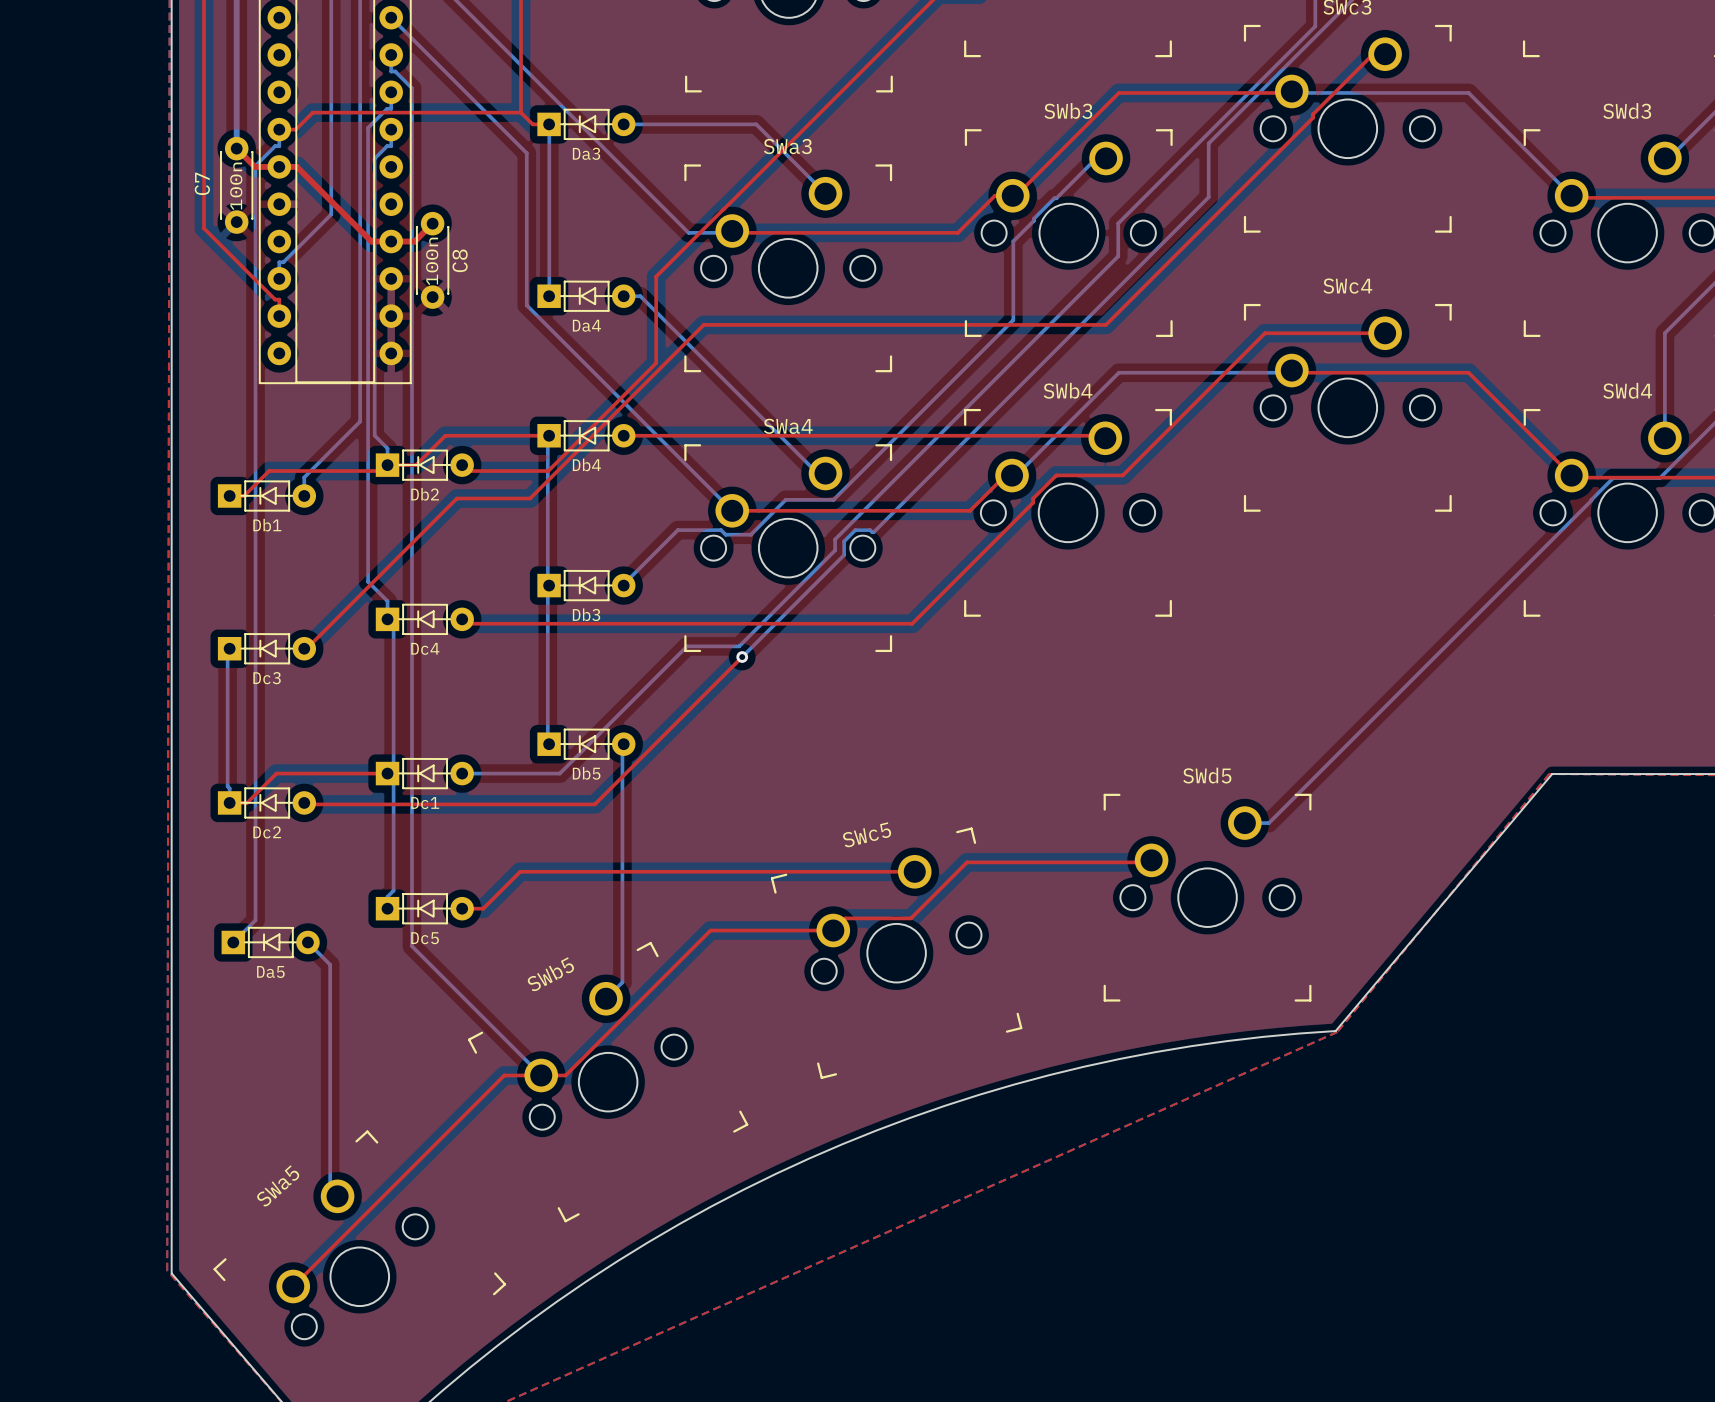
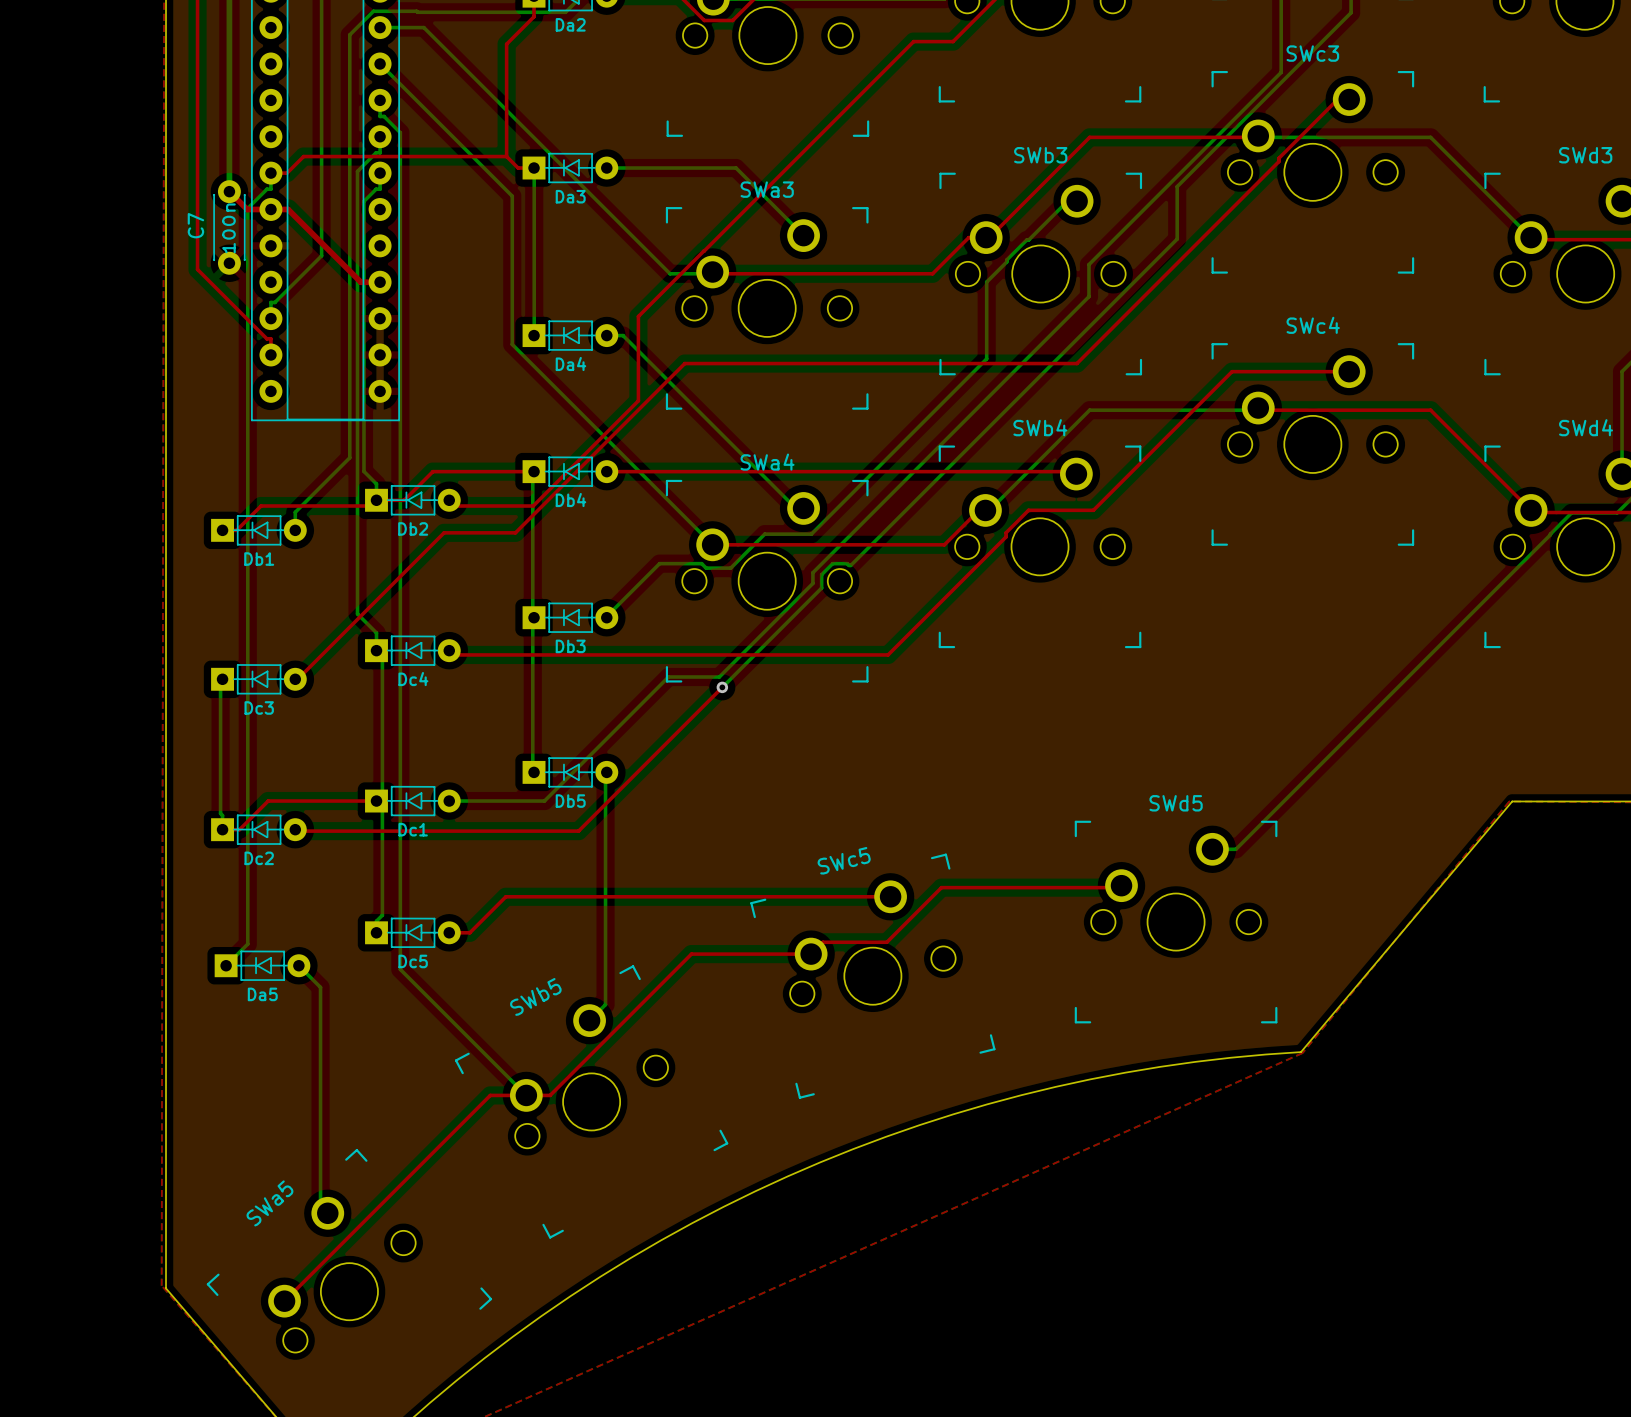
top track: (432, 223) (414, 241) (391, 241) -> none
C8: 100n (432, 260) -> none

